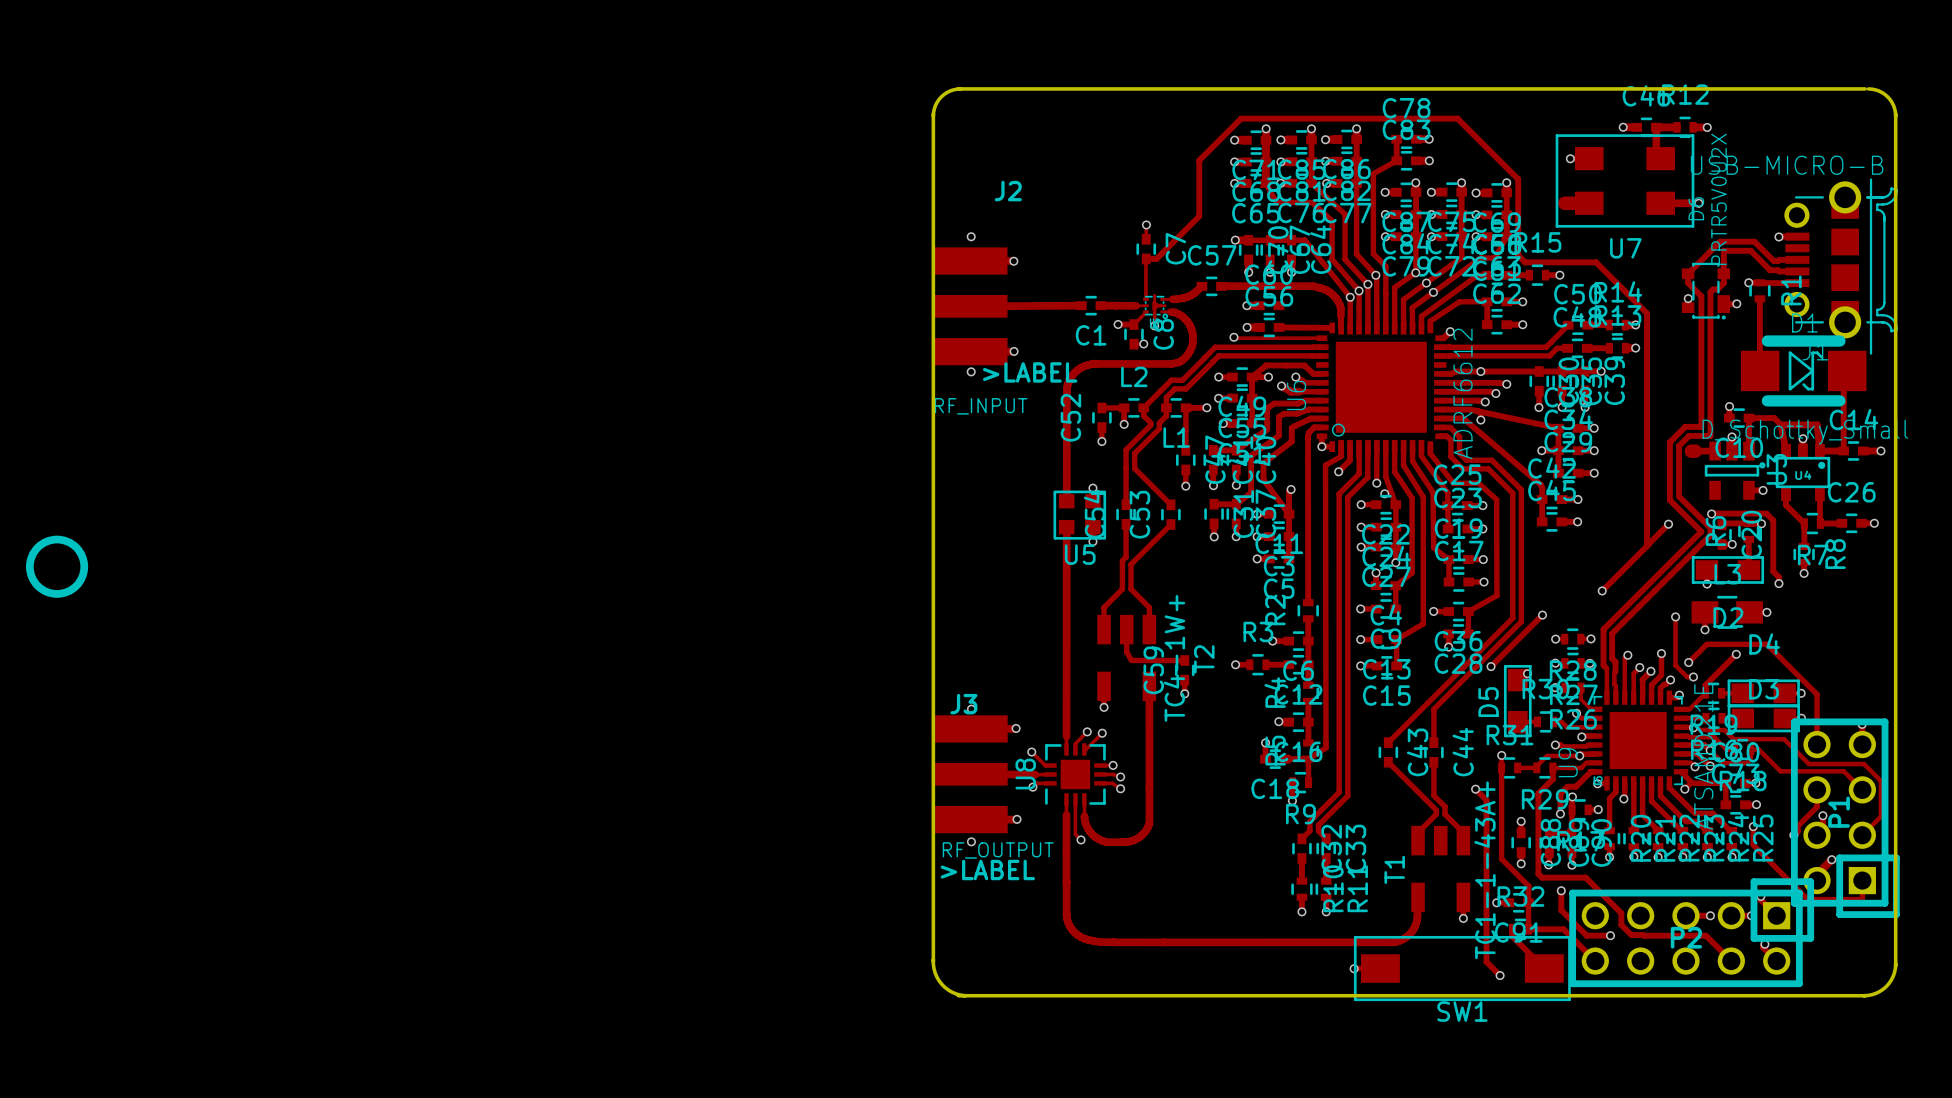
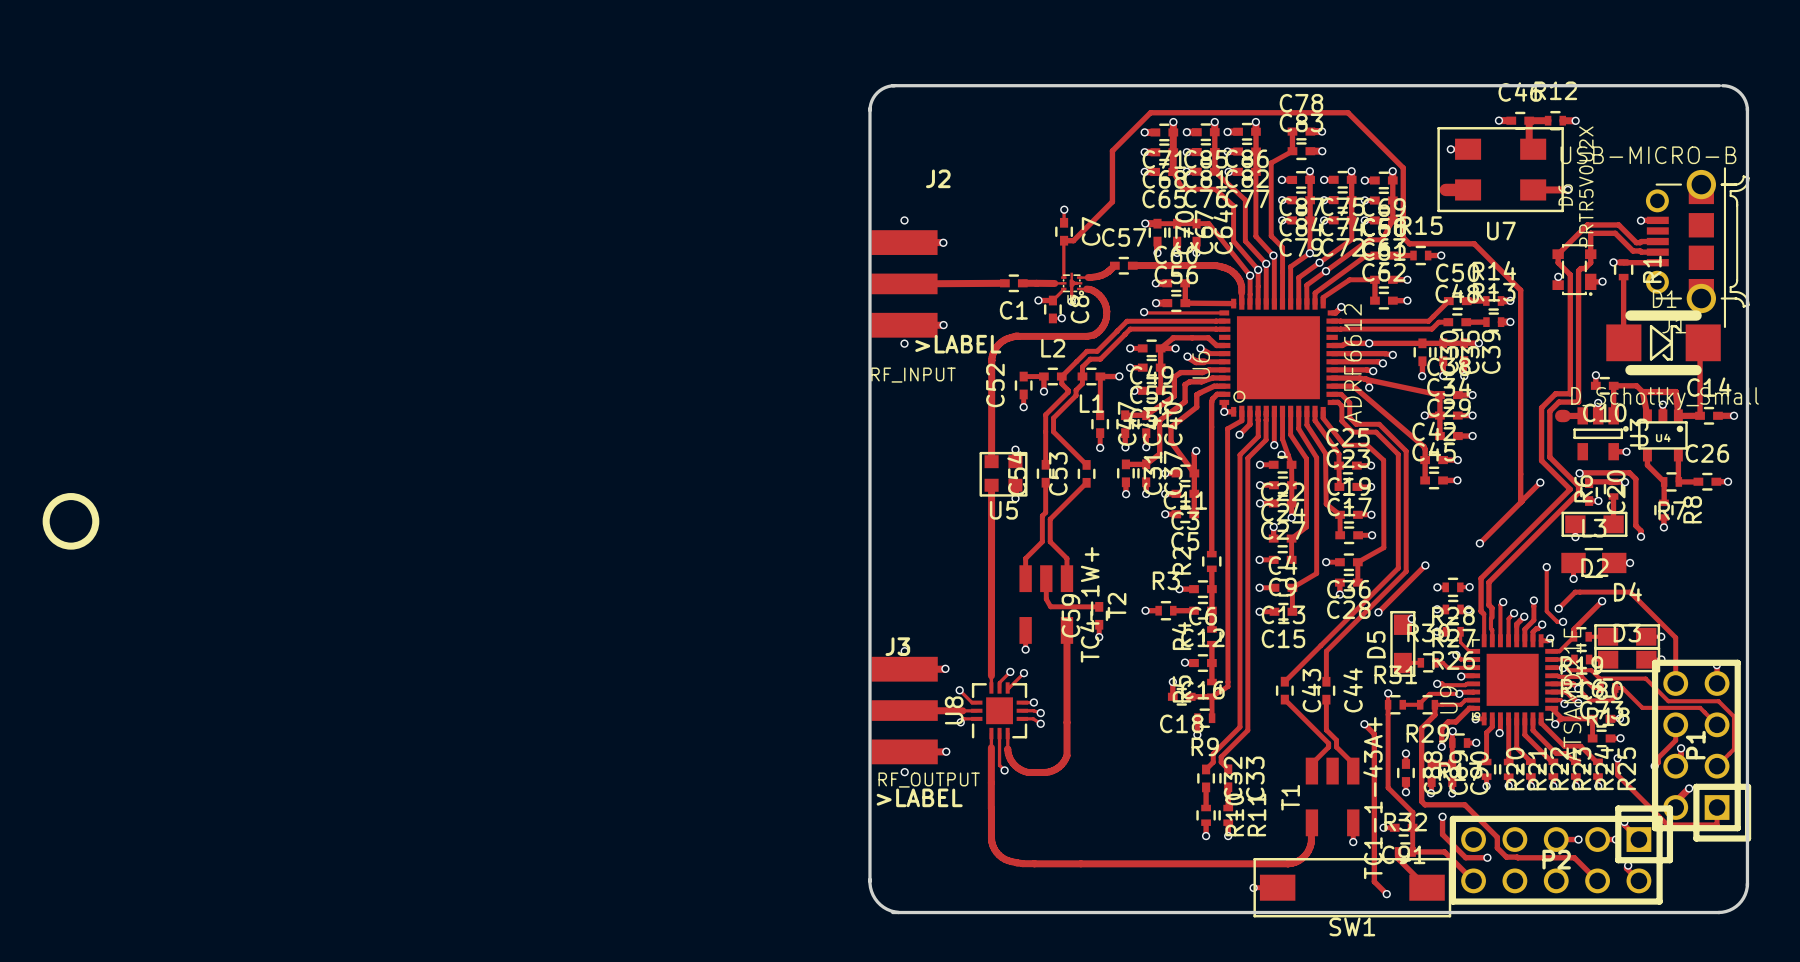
track: none -> (1185, 283) (1185, 303)

